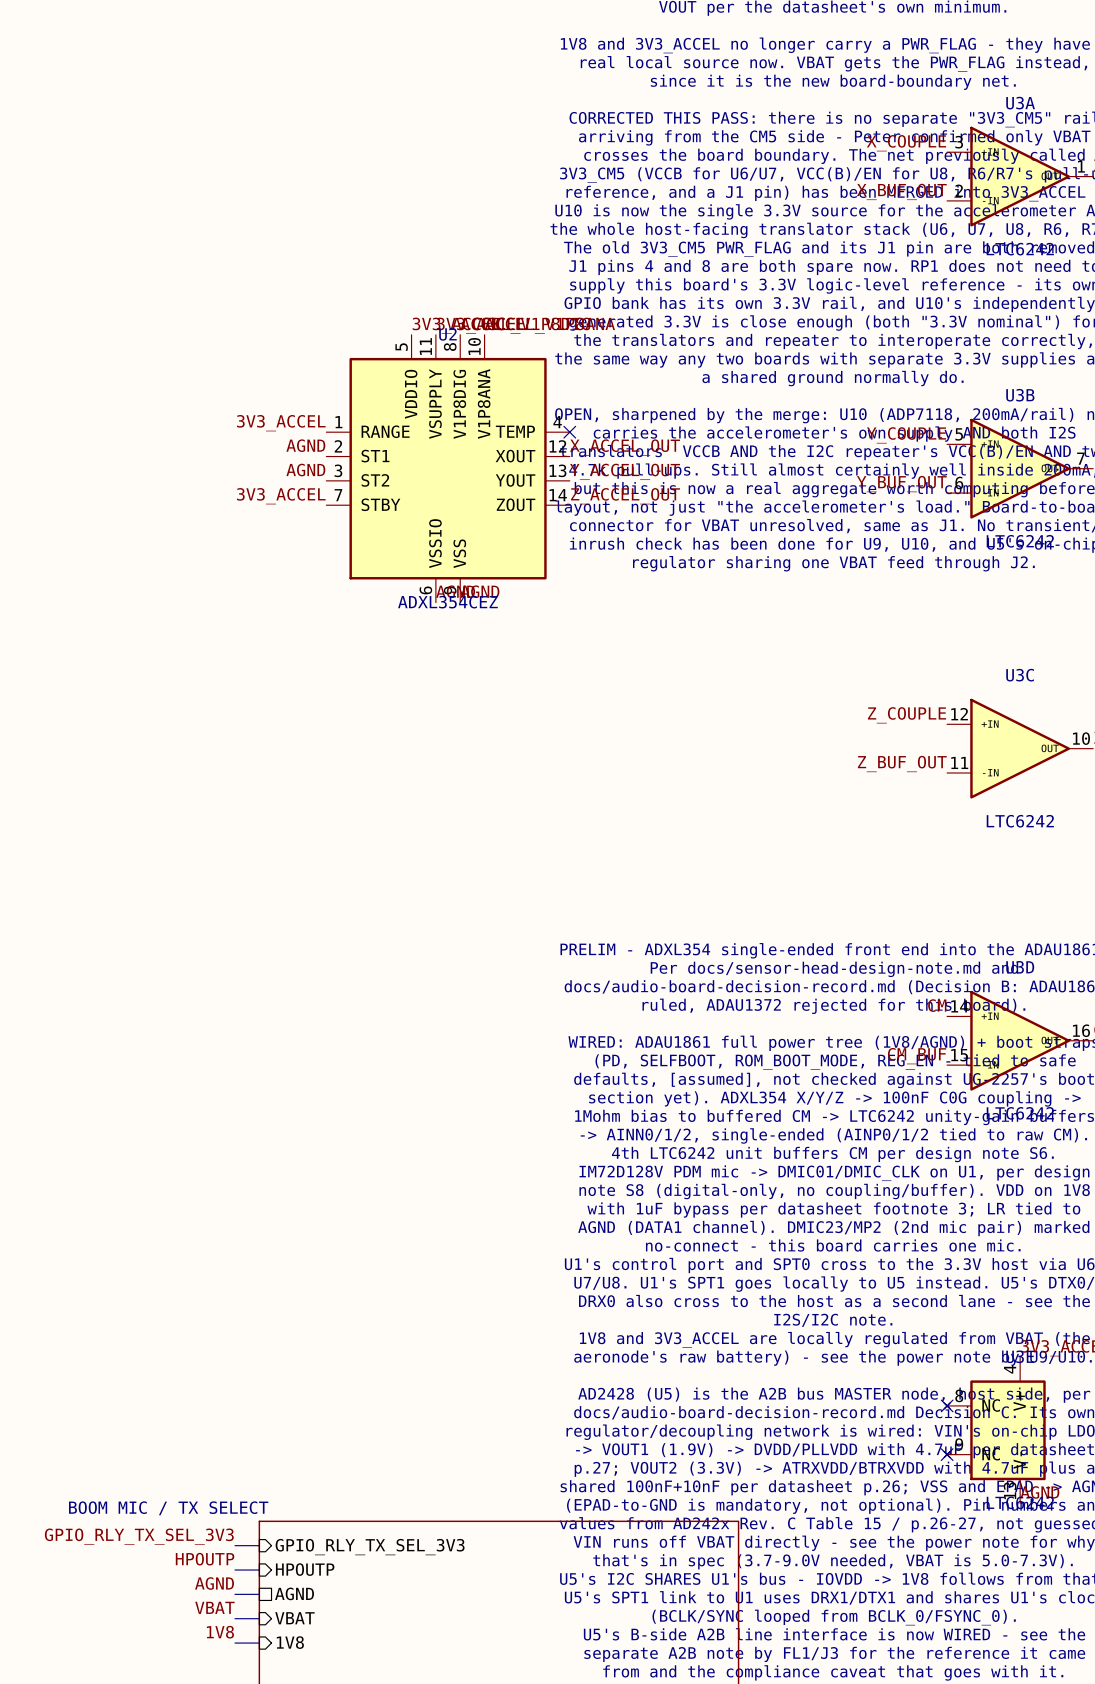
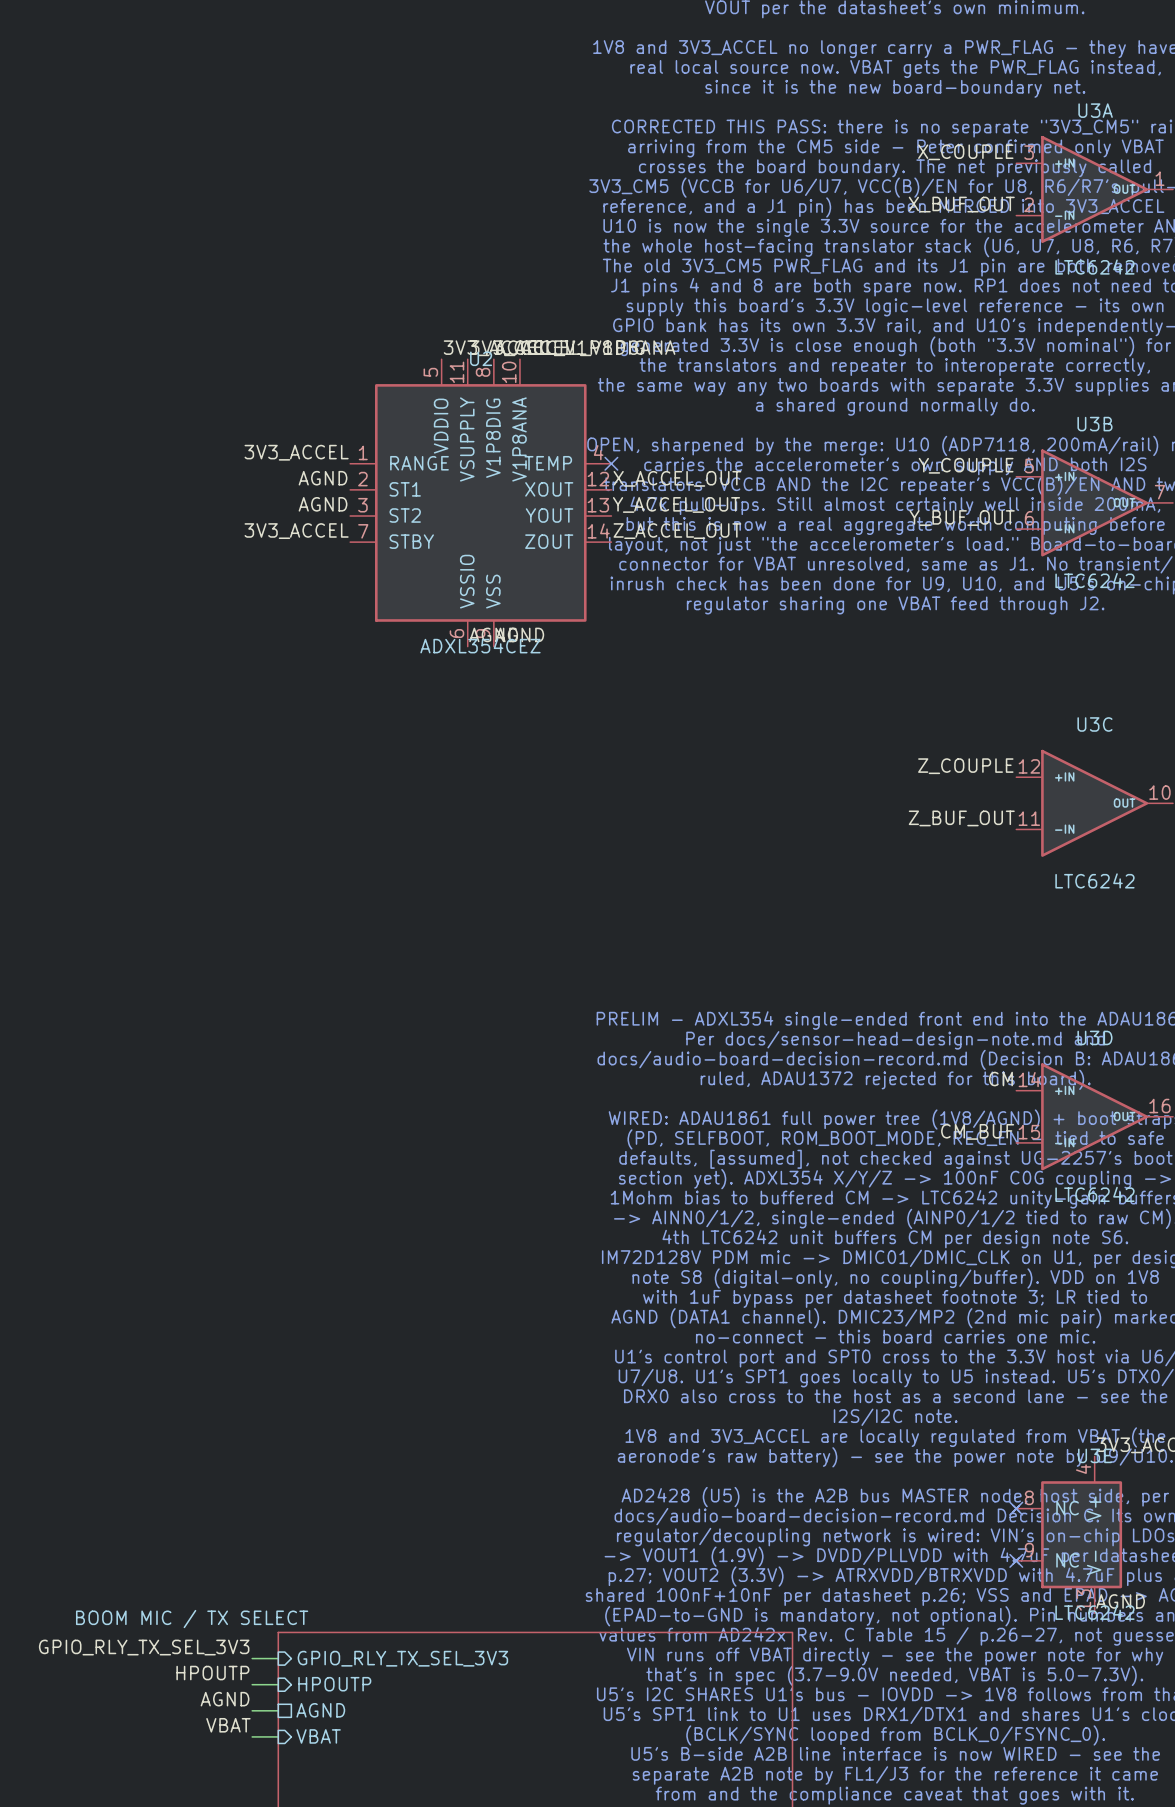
label: 1V8 (220, 1632) -> none
sheet pin: 1V8 (290, 1642) -> none
wire: (235, 1643) (259, 1643) -> none

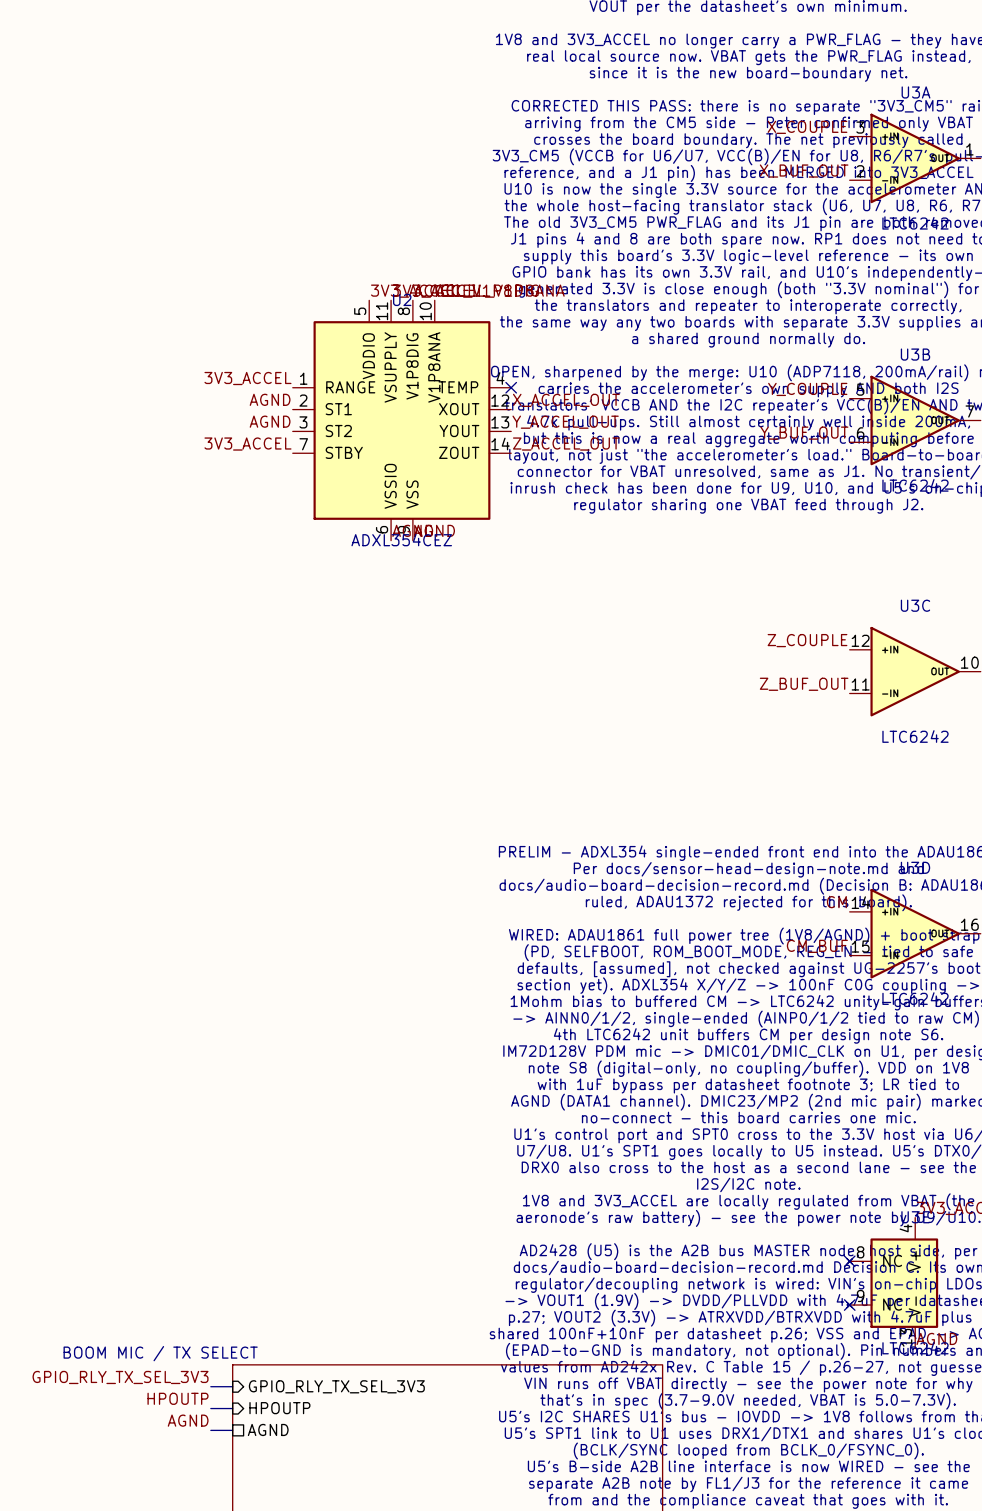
label: VBAT (228, 1725) -> none
wire: (252, 1736) (278, 1736) -> none
sheet pin: VBAT (318, 1736) -> none

